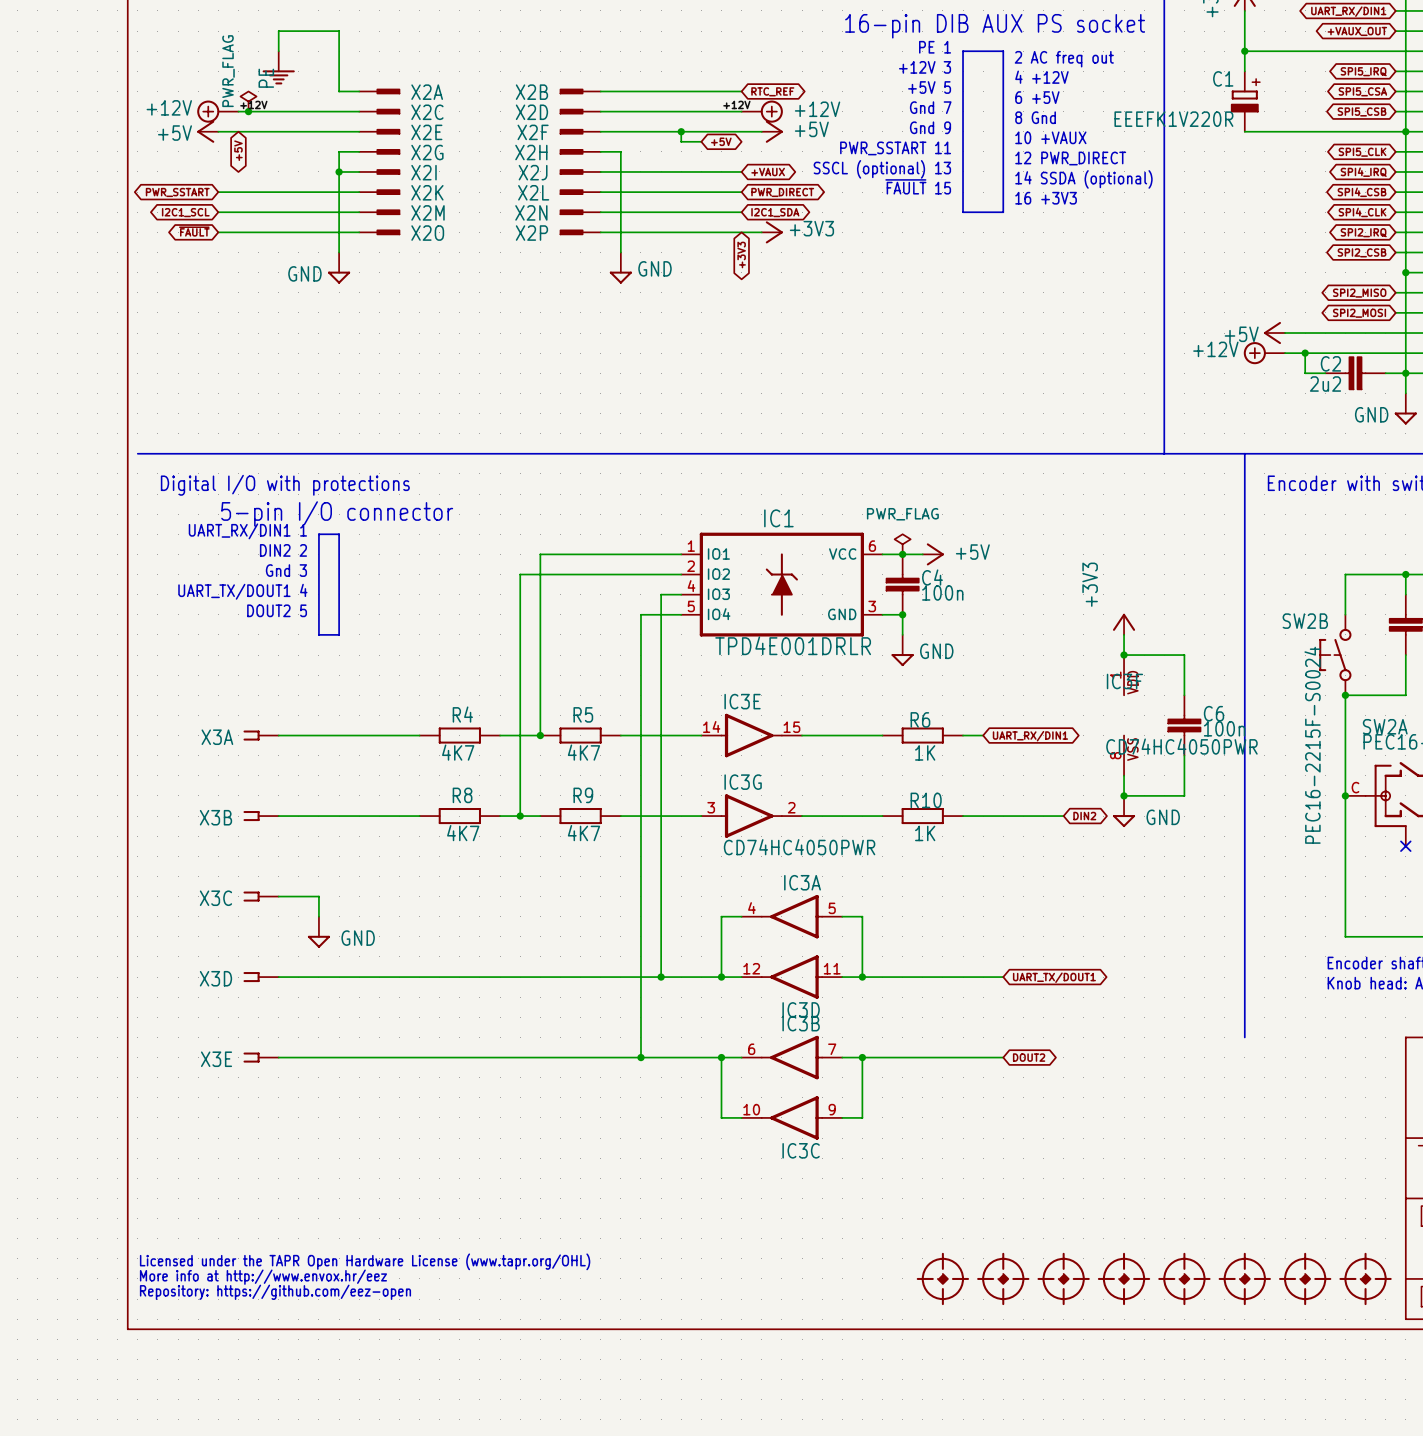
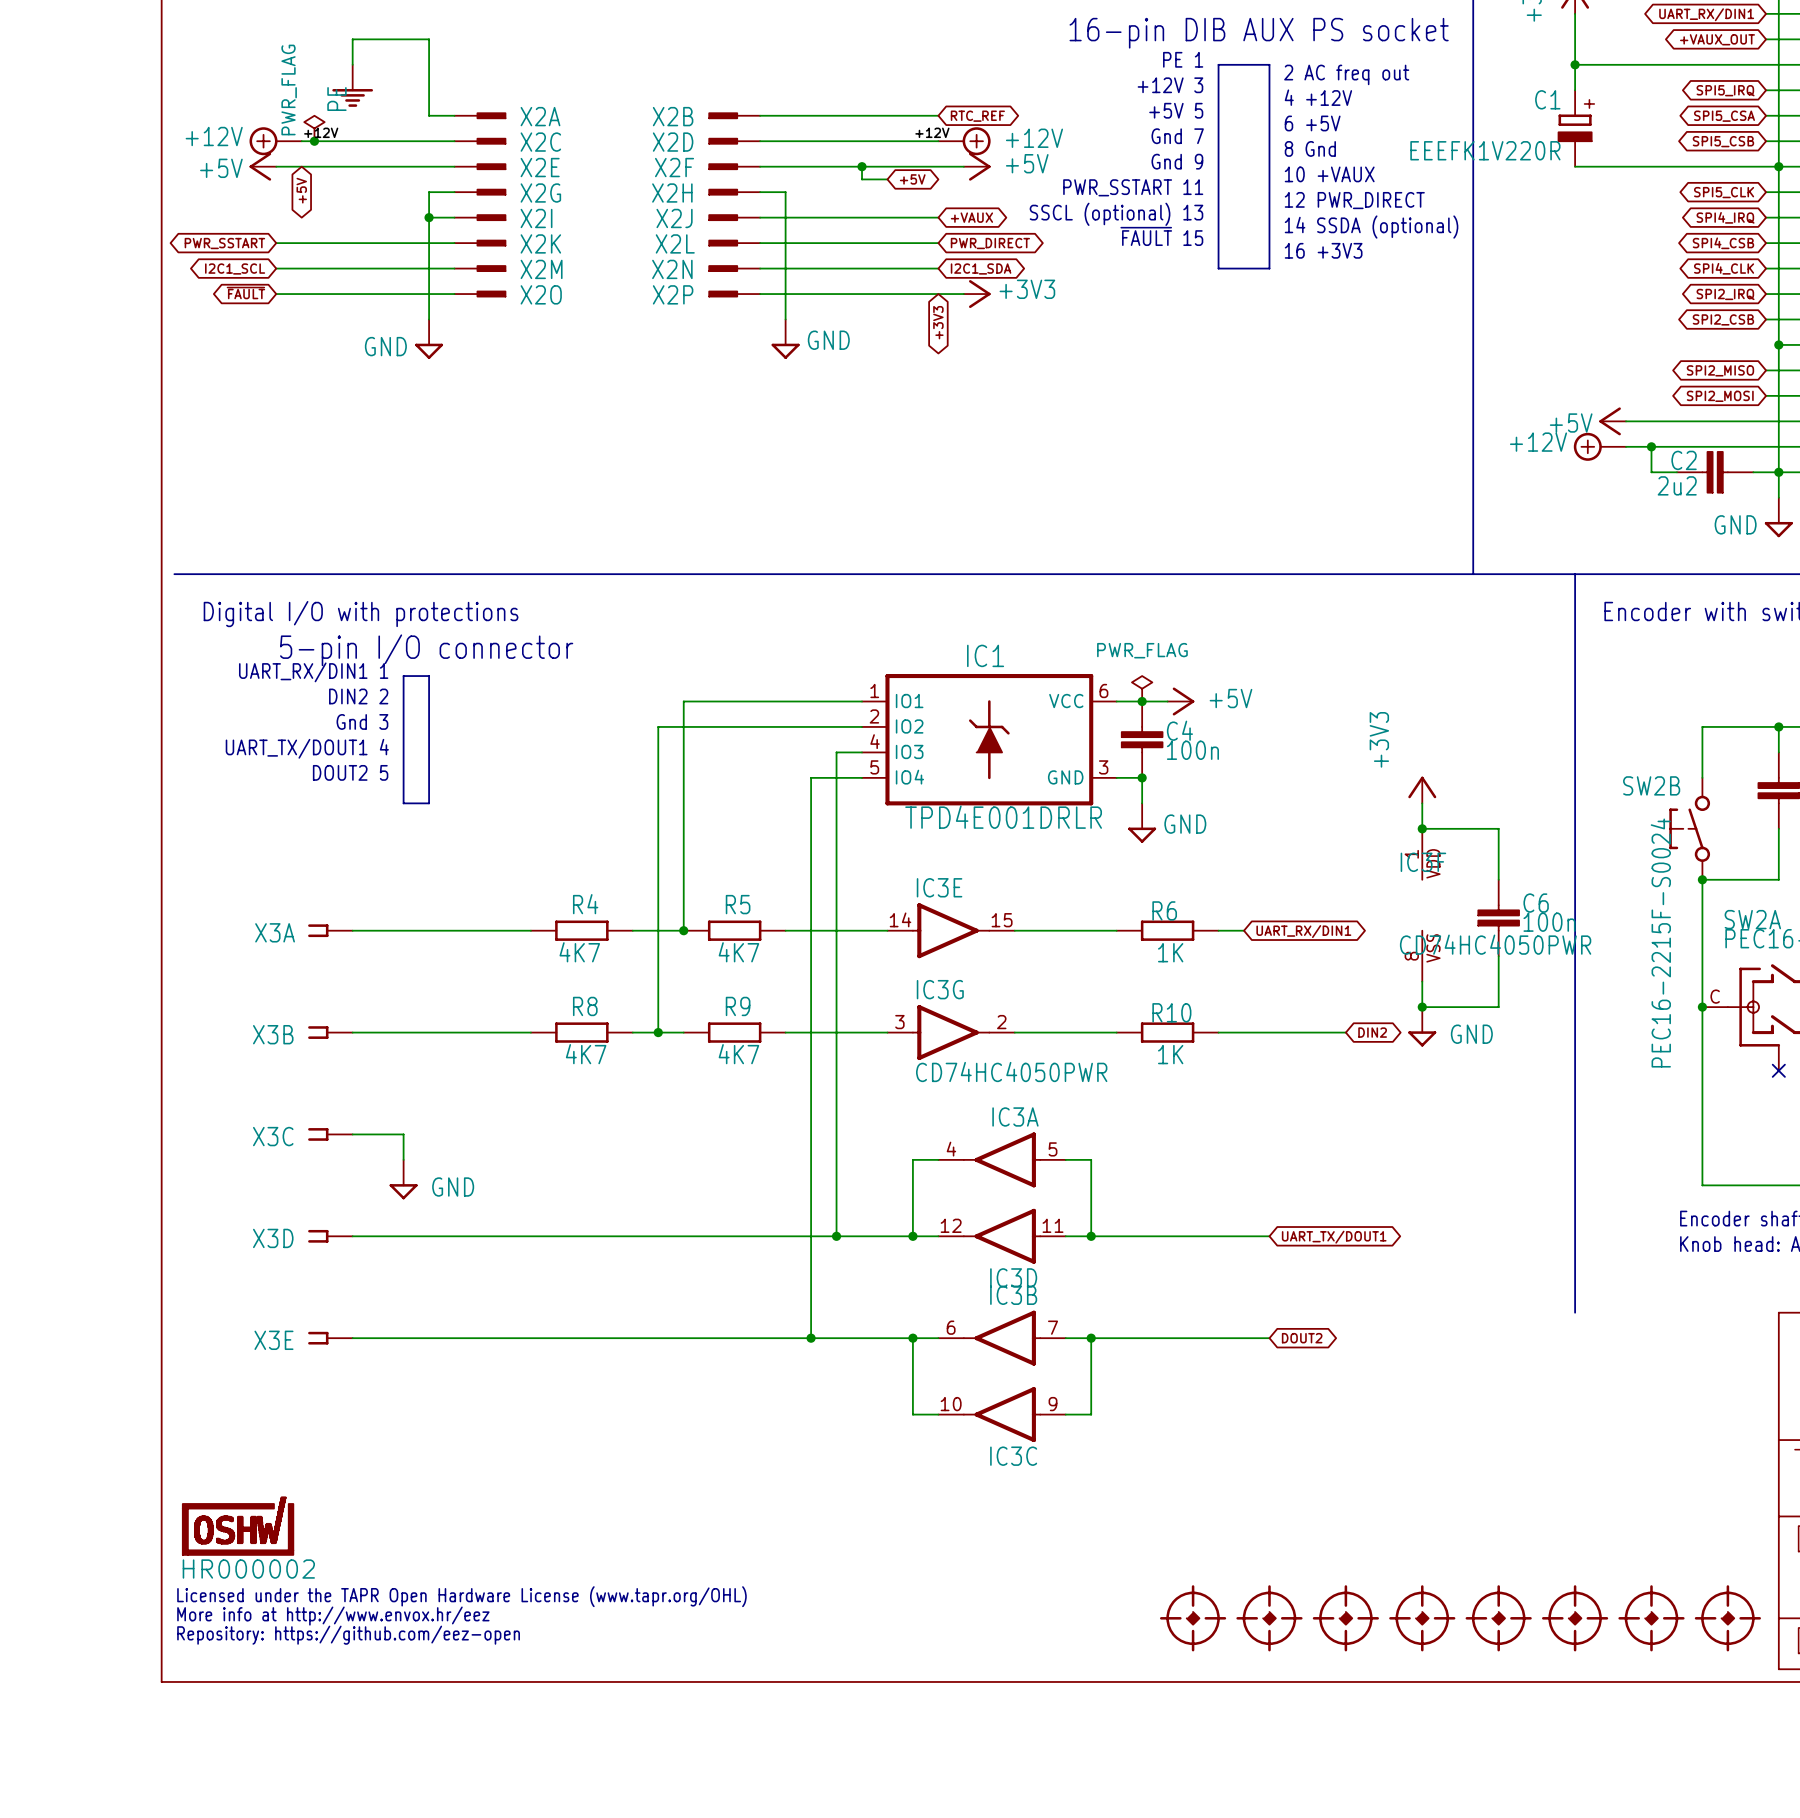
part: none -> HR000002 (238, 1526)

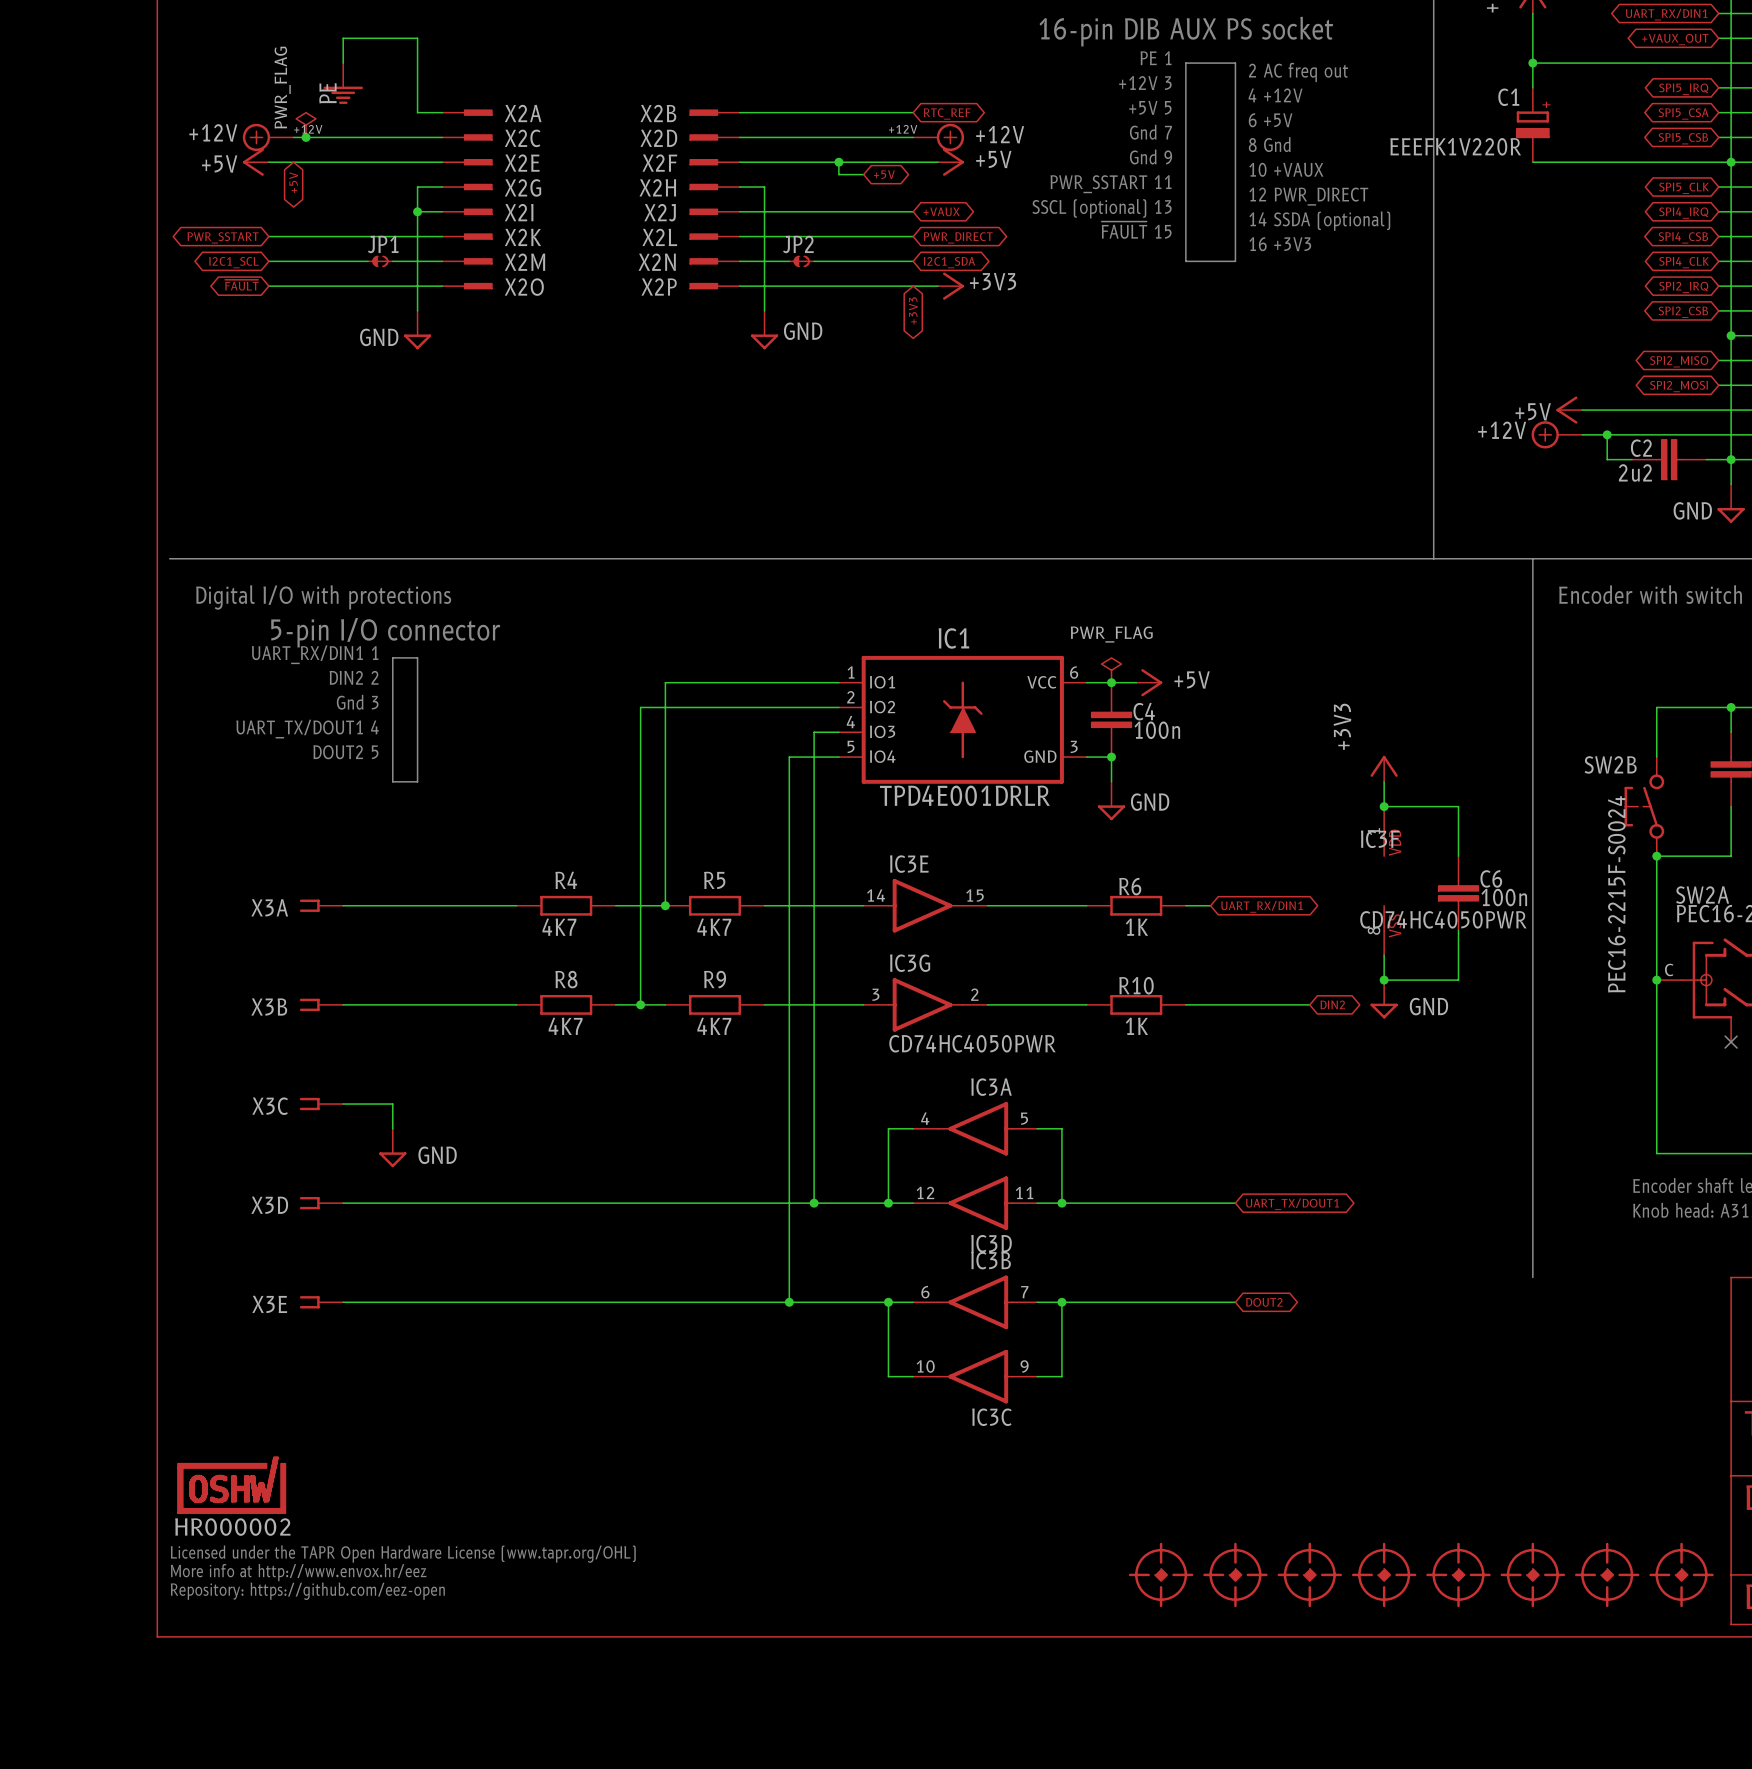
JP1: none -> (380, 261)
JP2: none -> (801, 261)

